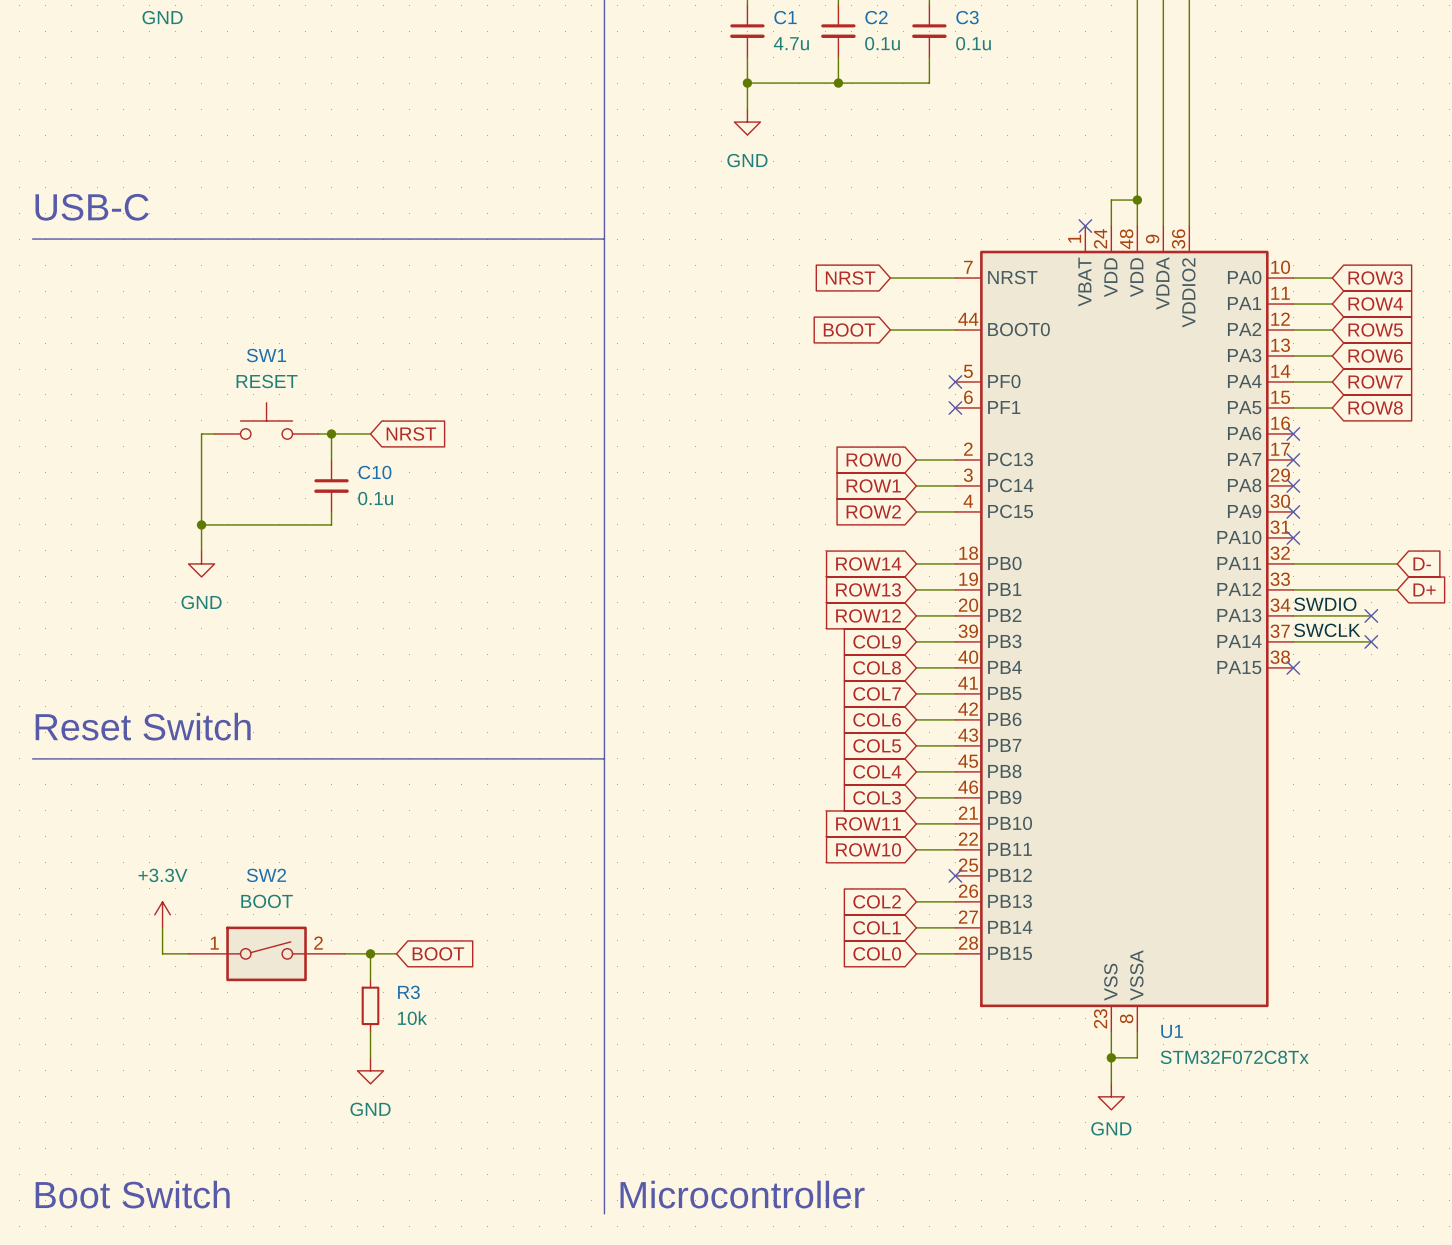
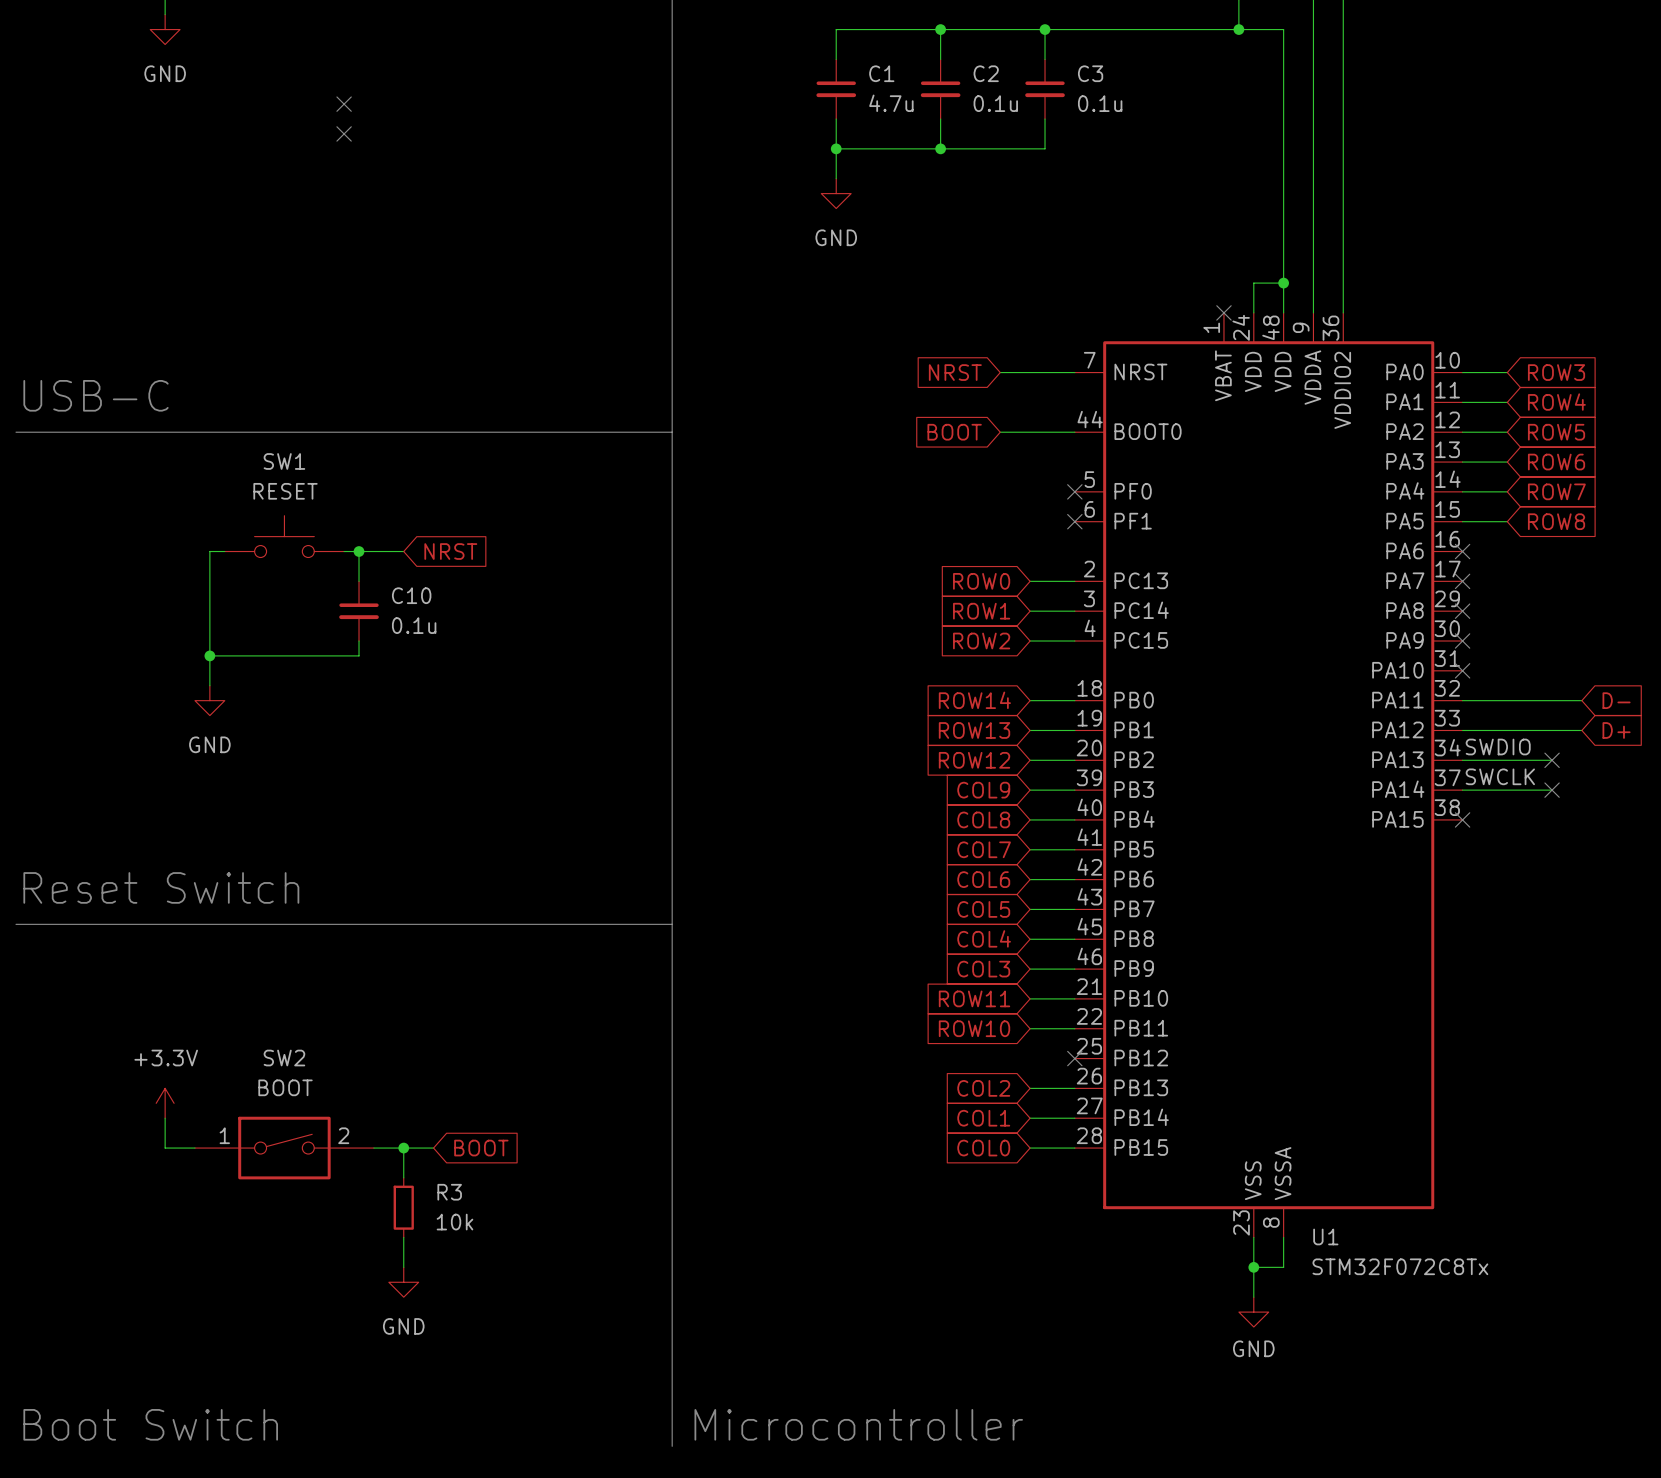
no-connect mark: none -> (344, 104)
no-connect mark: none -> (344, 133)
text position: USB-C (92, 207) -> USB-C (96, 395)
line: (32, 239) (604, 239) -> (16, 432) (672, 432)

